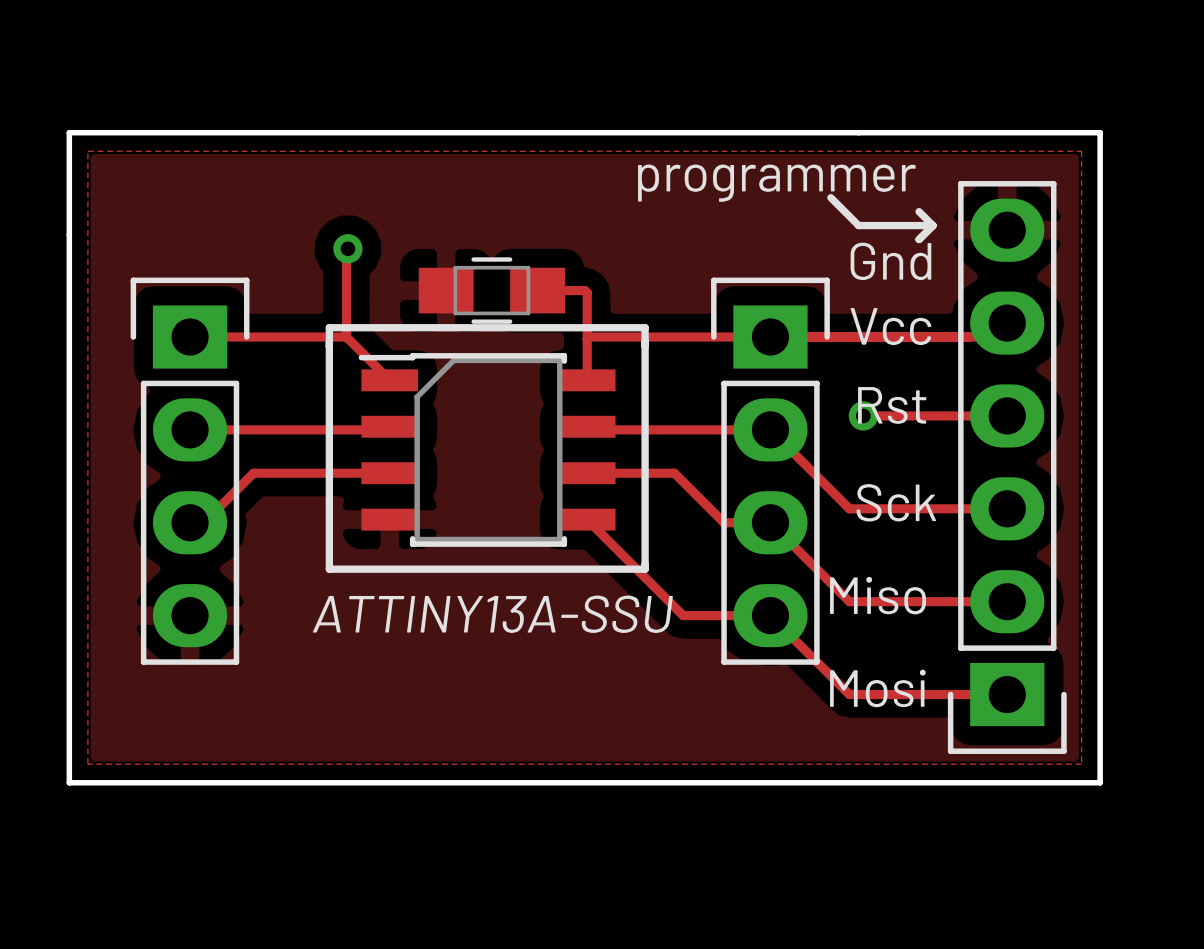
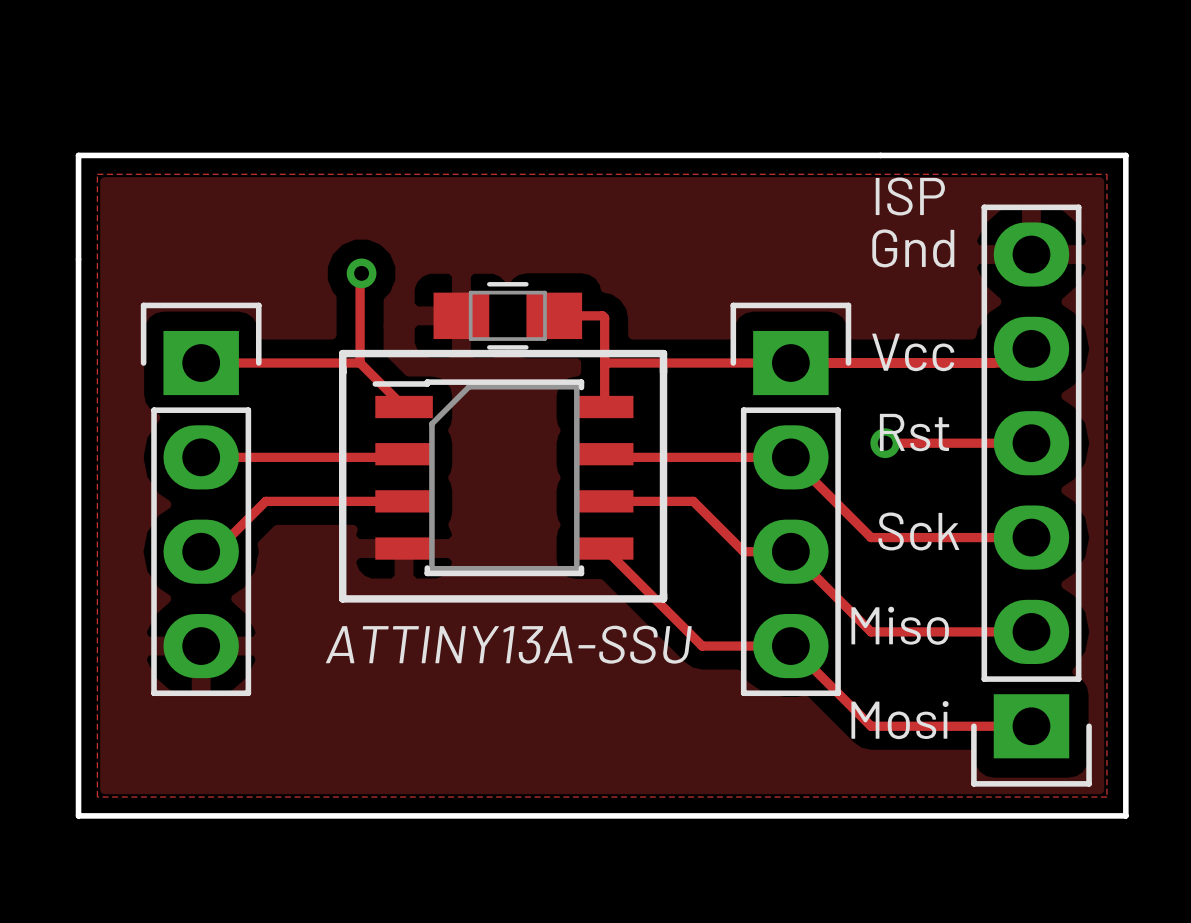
text: none -> ISP (910, 196)
text: programmer (777, 183) -> none
line: (830, 197) (858, 225) (932, 225) -> none
line: (919, 211) (932, 225) -> none
text position: Gnd (890, 261) -> Gnd (913, 248)

